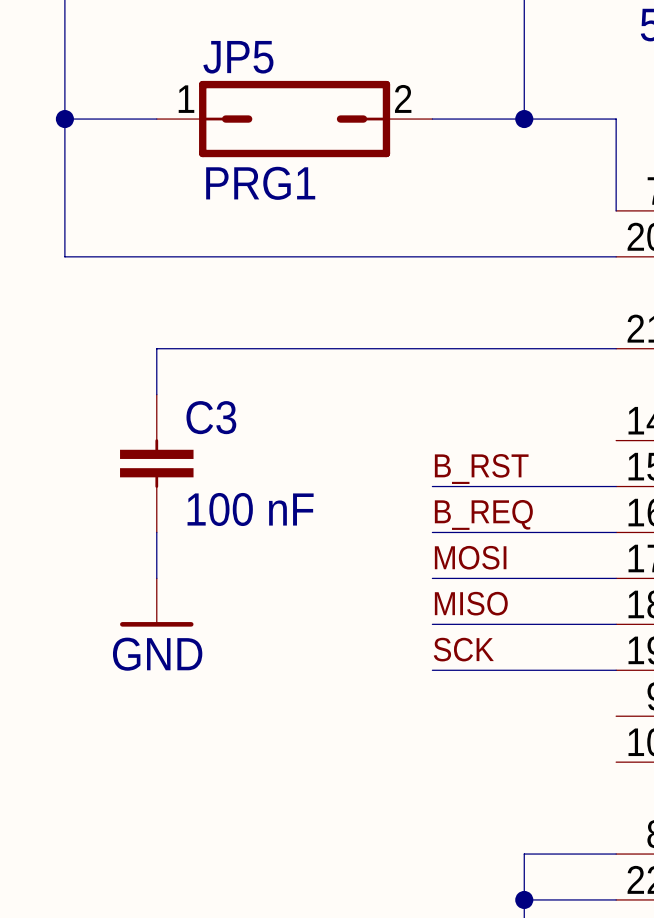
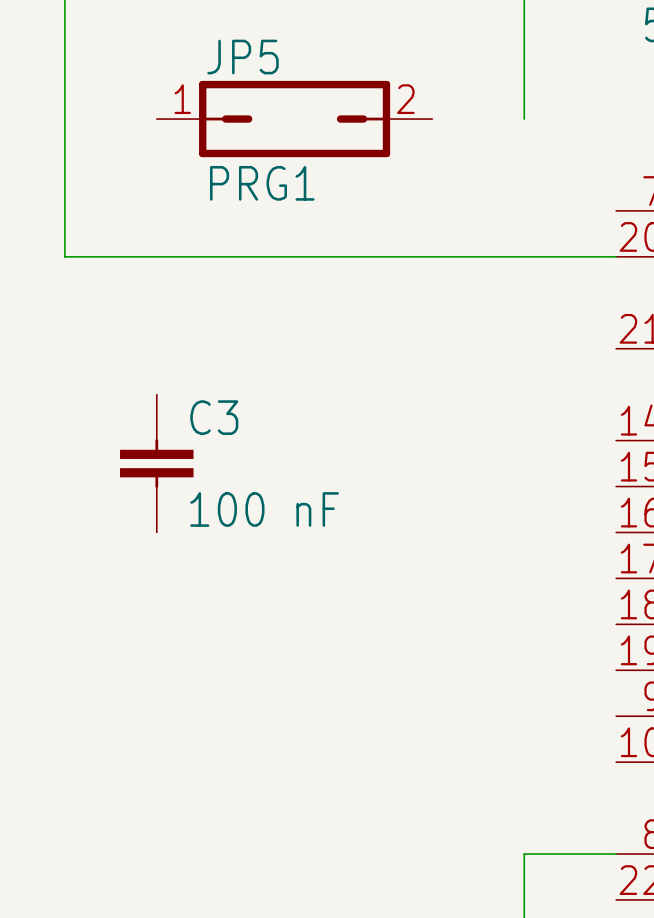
wire: (64, 119) (156, 119) -> none
junction: (64, 119) -> none
wire: (432, 119) (616, 119) (616, 210) -> none
junction: (524, 119) -> none
wire: (616, 348) (156, 348) (156, 394) -> none
label: B_RST (481, 469) -> none
wire: (432, 486) (616, 486) -> none
label: B_REQ (483, 514) -> none
wire: (156, 532) (156, 578) -> none
wire: (432, 532) (616, 532) -> none
label: MOSI (470, 557) -> none
wire: (432, 578) (616, 578) -> none
power symbol: GND (156, 602) -> none
label: MISO (471, 603) -> none
wire: (432, 624) (616, 624) -> none
label: SCK (463, 649) -> none
wire: (432, 670) (616, 670) -> none
wire: (524, 899) (616, 899) -> none
junction: (524, 899) -> none

